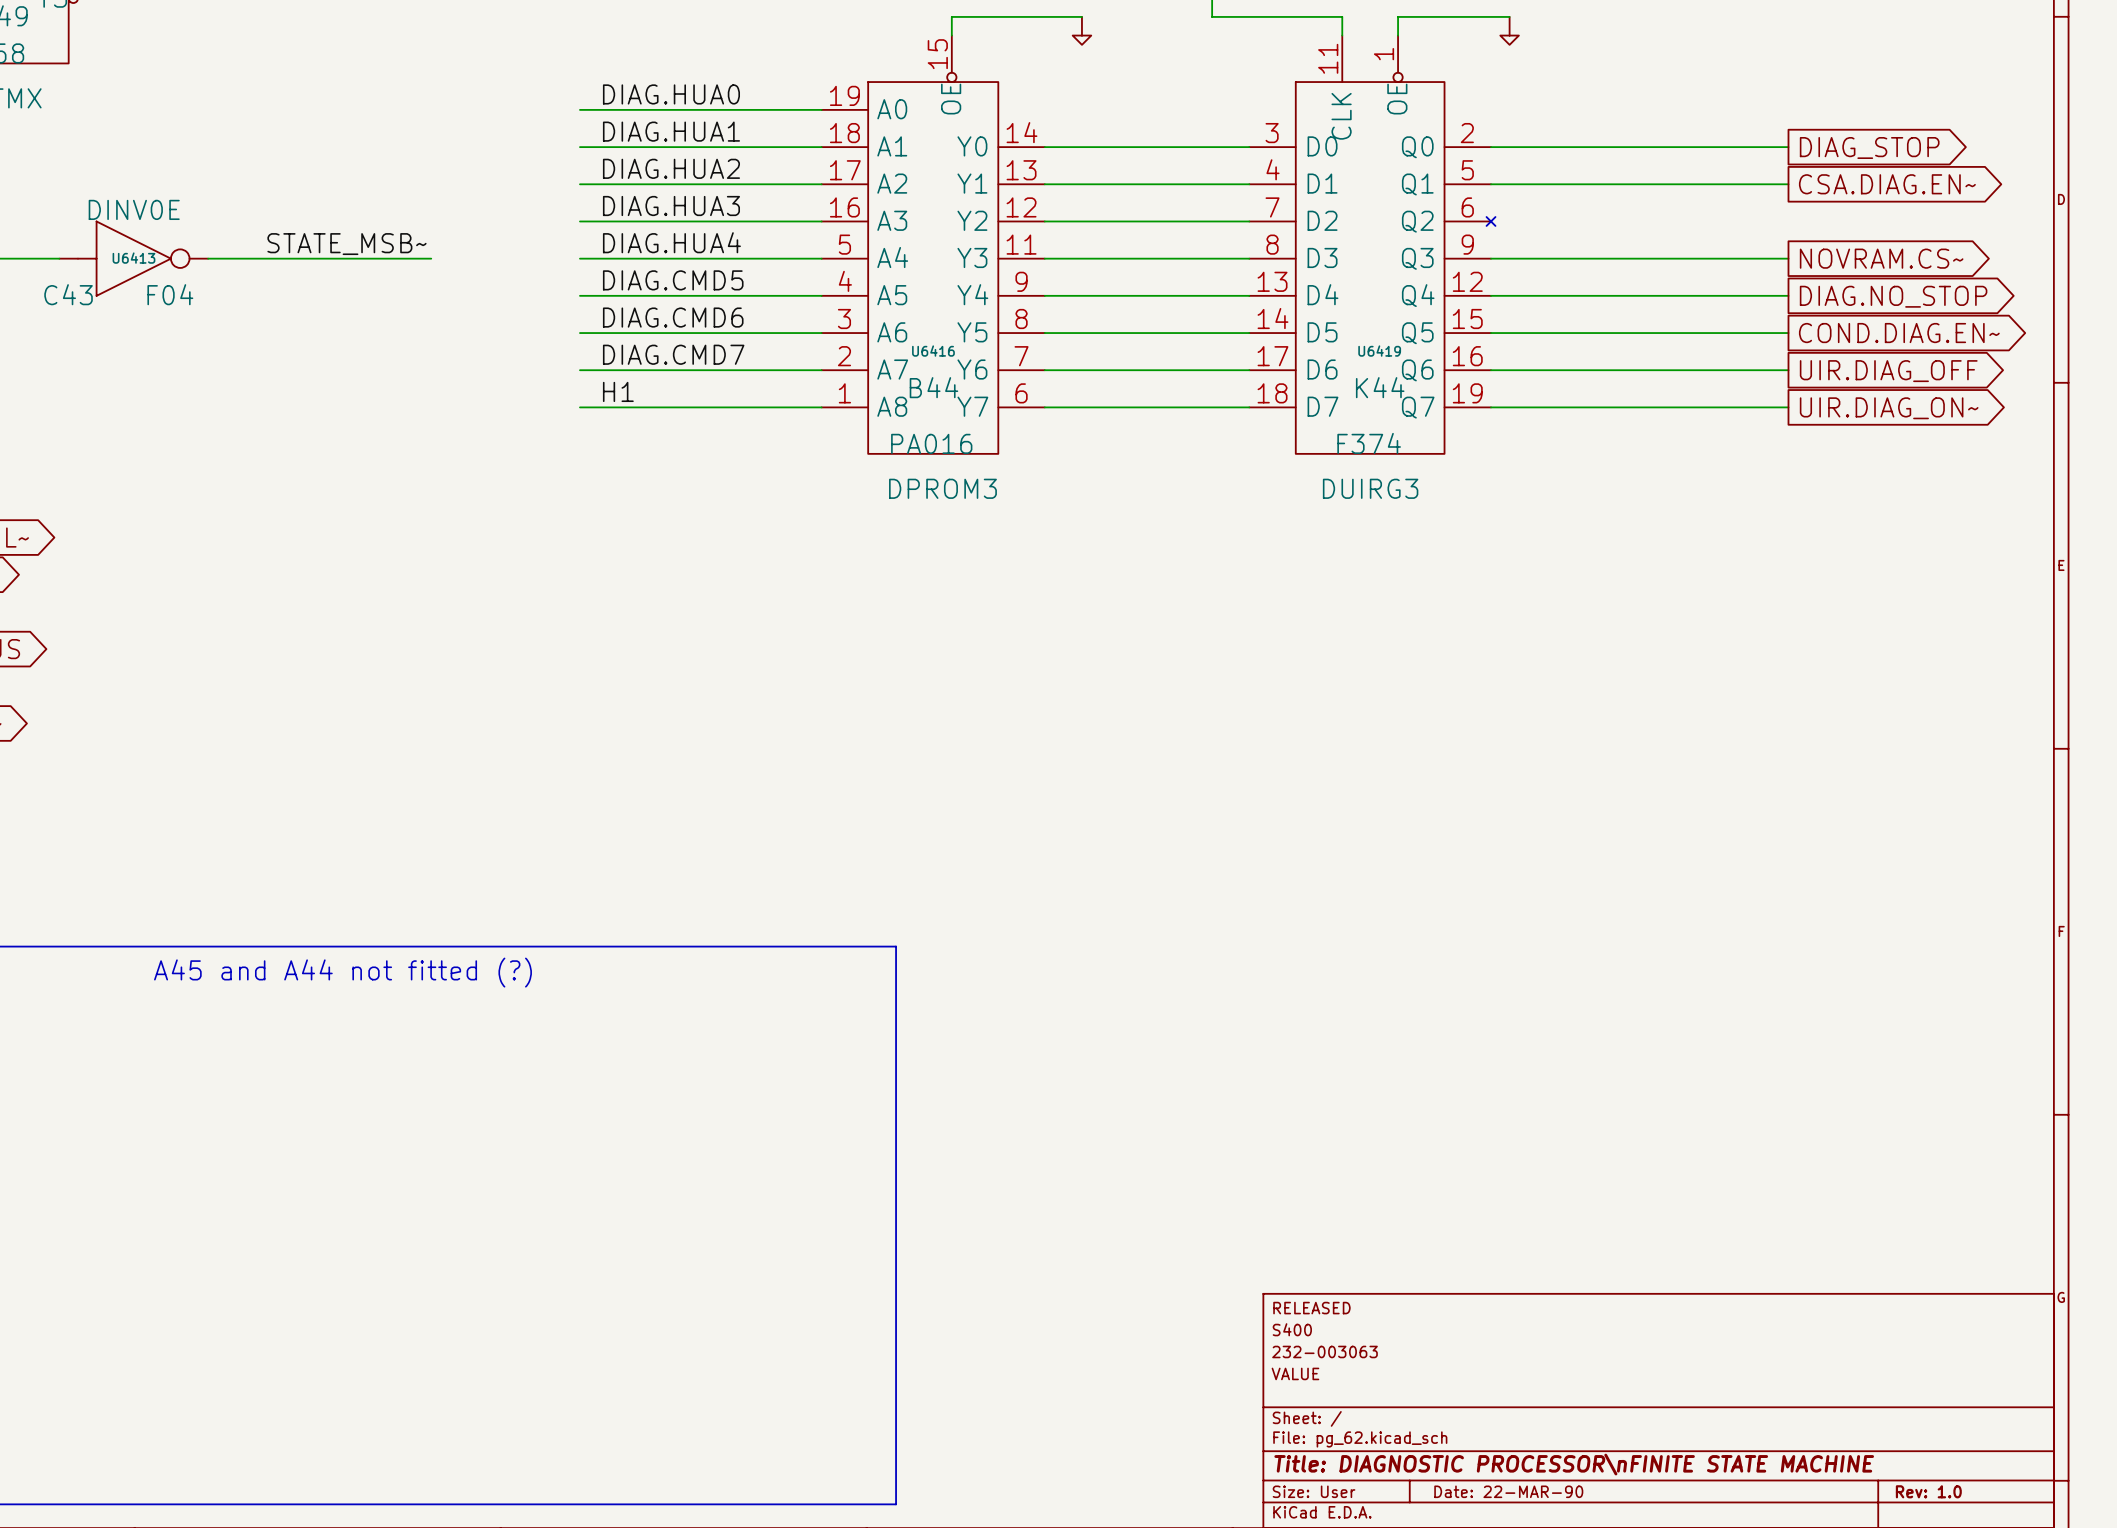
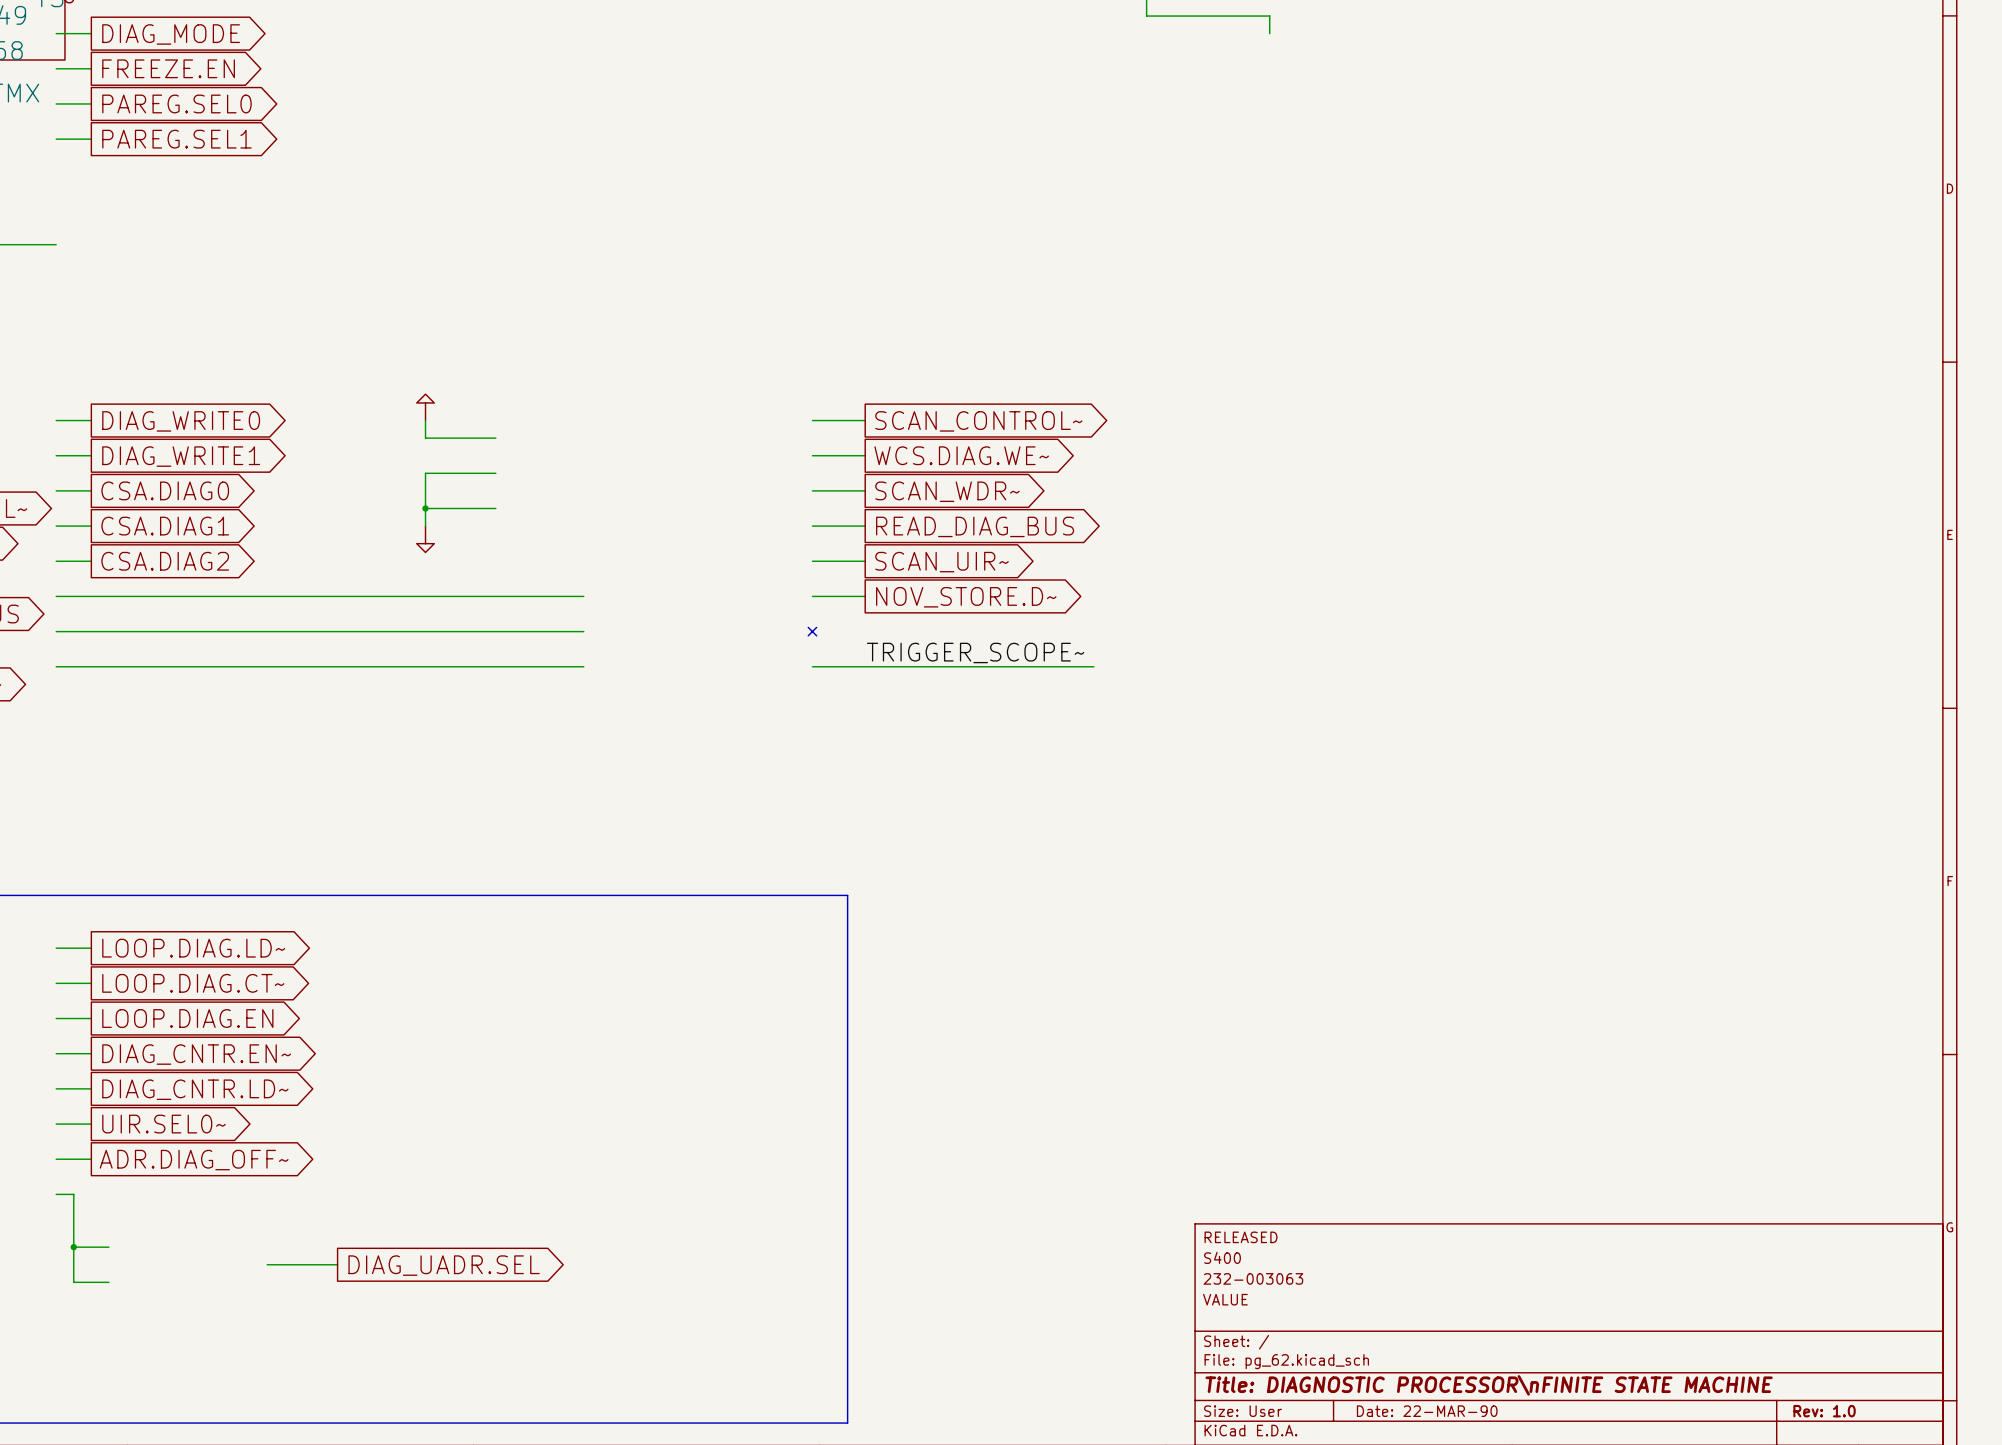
wire: (1081, 16) (951, 16) (951, 35) -> none
wire: (1509, 16) (1398, 16) (1398, 35) -> none
power symbol: (1081, 31) -> none
power symbol: (1509, 31) -> none
wire: none -> (56, 33) (91, 33)
global label: none -> DIAG_MODE (171, 34)
wire: none -> (56, 68) (91, 68)
global label: none -> FREEZE.EN (168, 68)
label: DIAG.HUA0 (671, 94) -> none
wire: none -> (56, 103) (91, 103)
global label: none -> PAREG.SEL0 (176, 103)
wire: (579, 109) (821, 109) -> none
label: DIAG.HUA1 (671, 131) -> none
wire: none -> (56, 139) (91, 139)
global label: none -> PAREG.SEL1 (176, 139)
wire: (579, 147) (821, 147) -> none
wire: (1044, 147) (1249, 147) -> none
wire: (1491, 147) (1788, 147) -> none
global label: DIAG_STOP (1869, 147) -> none
label: DIAG.HUA2 (671, 168) -> none
wire: (579, 184) (821, 184) -> none
wire: (1044, 184) (1249, 184) -> none
wire: (1491, 184) (1788, 184) -> none
global label: CSA.DIAG.EN~ (1887, 184) -> none
label: DIAG.HUA3 (671, 206) -> none
wire: (579, 221) (821, 221) -> none
wire: (1044, 221) (1249, 221) -> none
no-connect mark: (1491, 221) -> none
label: DIAG.HUA4 (671, 242) -> none
label: STATE_MSB~ (346, 244) -> none
U6416: PA016 (933, 244) -> none
U6419: F374 (1370, 244) -> none
U6413: F04 (133, 258) -> none
wire: (208, 258) (431, 258) -> none
wire: (579, 258) (821, 258) -> none
wire: (1044, 258) (1249, 258) -> none
wire: (1491, 258) (1788, 258) -> none
global label: NOVRAM.CS~ (1881, 258) -> none
label: DIAG.CMD5 (673, 280) -> none
wire: (579, 295) (821, 295) -> none
wire: (1044, 295) (1249, 295) -> none
wire: (1491, 295) (1788, 295) -> none
global label: DIAG.NO_STOP (1893, 296) -> none
label: DIAG.CMD6 (673, 317) -> none
wire: (579, 333) (821, 333) -> none
wire: (1044, 333) (1249, 333) -> none
wire: (1491, 333) (1788, 333) -> none
global label: COND.DIAG.EN~ (1899, 333) -> none
label: DIAG.CMD7 (673, 354) -> none
wire: (579, 370) (821, 370) -> none
wire: (1044, 370) (1249, 370) -> none
wire: (1491, 370) (1788, 370) -> none
global label: UIR.DIAG_OFF (1888, 371) -> none
label: H1 (618, 391) -> none
wire: (579, 407) (821, 407) -> none
wire: (1044, 407) (1249, 407) -> none
wire: (1491, 407) (1788, 407) -> none
global label: UIR.DIAG_ON~ (1889, 408) -> none
power symbol: none -> (425, 407)
wire: none -> (56, 420) (91, 420)
wire: none -> (425, 420) (425, 438) (495, 438)
wire: none -> (812, 420) (865, 420)
global label: none -> DIAG_WRITE0 (181, 421)
global label: none -> SCAN_CONTROL~ (978, 421)
wire: none -> (56, 455) (91, 455)
wire: none -> (812, 455) (865, 455)
global label: none -> WCS.DIAG.WE~ (961, 455)
global label: none -> DIAG_WRITE1 (181, 456)
wire: none -> (495, 473) (425, 473) (425, 526)
wire: none -> (56, 490) (91, 490)
global label: none -> CSA.DIAG0 (165, 490)
wire: none -> (812, 490) (865, 490)
global label: none -> SCAN_WDR~ (947, 491)
wire: none -> (425, 508) (495, 508)
junction: none -> (425, 508)
wire: none -> (56, 526) (91, 526)
global label: none -> CSA.DIAG1 (165, 526)
wire: none -> (812, 526) (865, 526)
global label: none -> READ_DIAG_BUS (975, 526)
power symbol: none -> (425, 539)
wire: none -> (56, 561) (91, 561)
global label: none -> CSA.DIAG2 (165, 561)
wire: none -> (812, 561) (865, 561)
global label: none -> SCAN_UIR~ (942, 562)
wire: none -> (56, 596) (583, 596)
wire: none -> (812, 596) (865, 596)
global label: none -> NOV_STORE.D~ (966, 597)
wire: none -> (56, 631) (583, 631)
no-connect mark: none -> (812, 631)
label: none -> TRIGGER_SCOPE~ (975, 652)
wire: none -> (56, 666) (583, 666)
wire: none -> (812, 666) (1093, 666)
text: A45 and A44 not fitted (?) (342, 972) -> none
wire: none -> (56, 948) (91, 948)
global label: none -> LOOP.DIAG.LD~ (193, 948)
wire: none -> (56, 983) (91, 983)
global label: none -> LOOP.DIAG.CT~ (193, 983)
wire: none -> (56, 1018) (91, 1018)
global label: none -> LOOP.DIAG.EN (187, 1018)
wire: none -> (56, 1053) (91, 1053)
global label: none -> DIAG_CNTR.EN~ (196, 1054)
wire: none -> (56, 1088) (91, 1088)
global label: none -> DIAG_CNTR.LD~ (195, 1089)
wire: none -> (56, 1124) (91, 1124)
global label: none -> UIR.SEL0~ (163, 1124)
wire: none -> (56, 1159) (91, 1159)
global label: none -> ADR.DIAG_OFF~ (194, 1160)
wire: none -> (56, 1194) (73, 1194) (73, 1282) (108, 1282)
wire: none -> (73, 1247) (108, 1247)
junction: none -> (73, 1247)
wire: none -> (267, 1264) (337, 1264)
global label: none -> DIAG_UADR.SEL (444, 1265)

